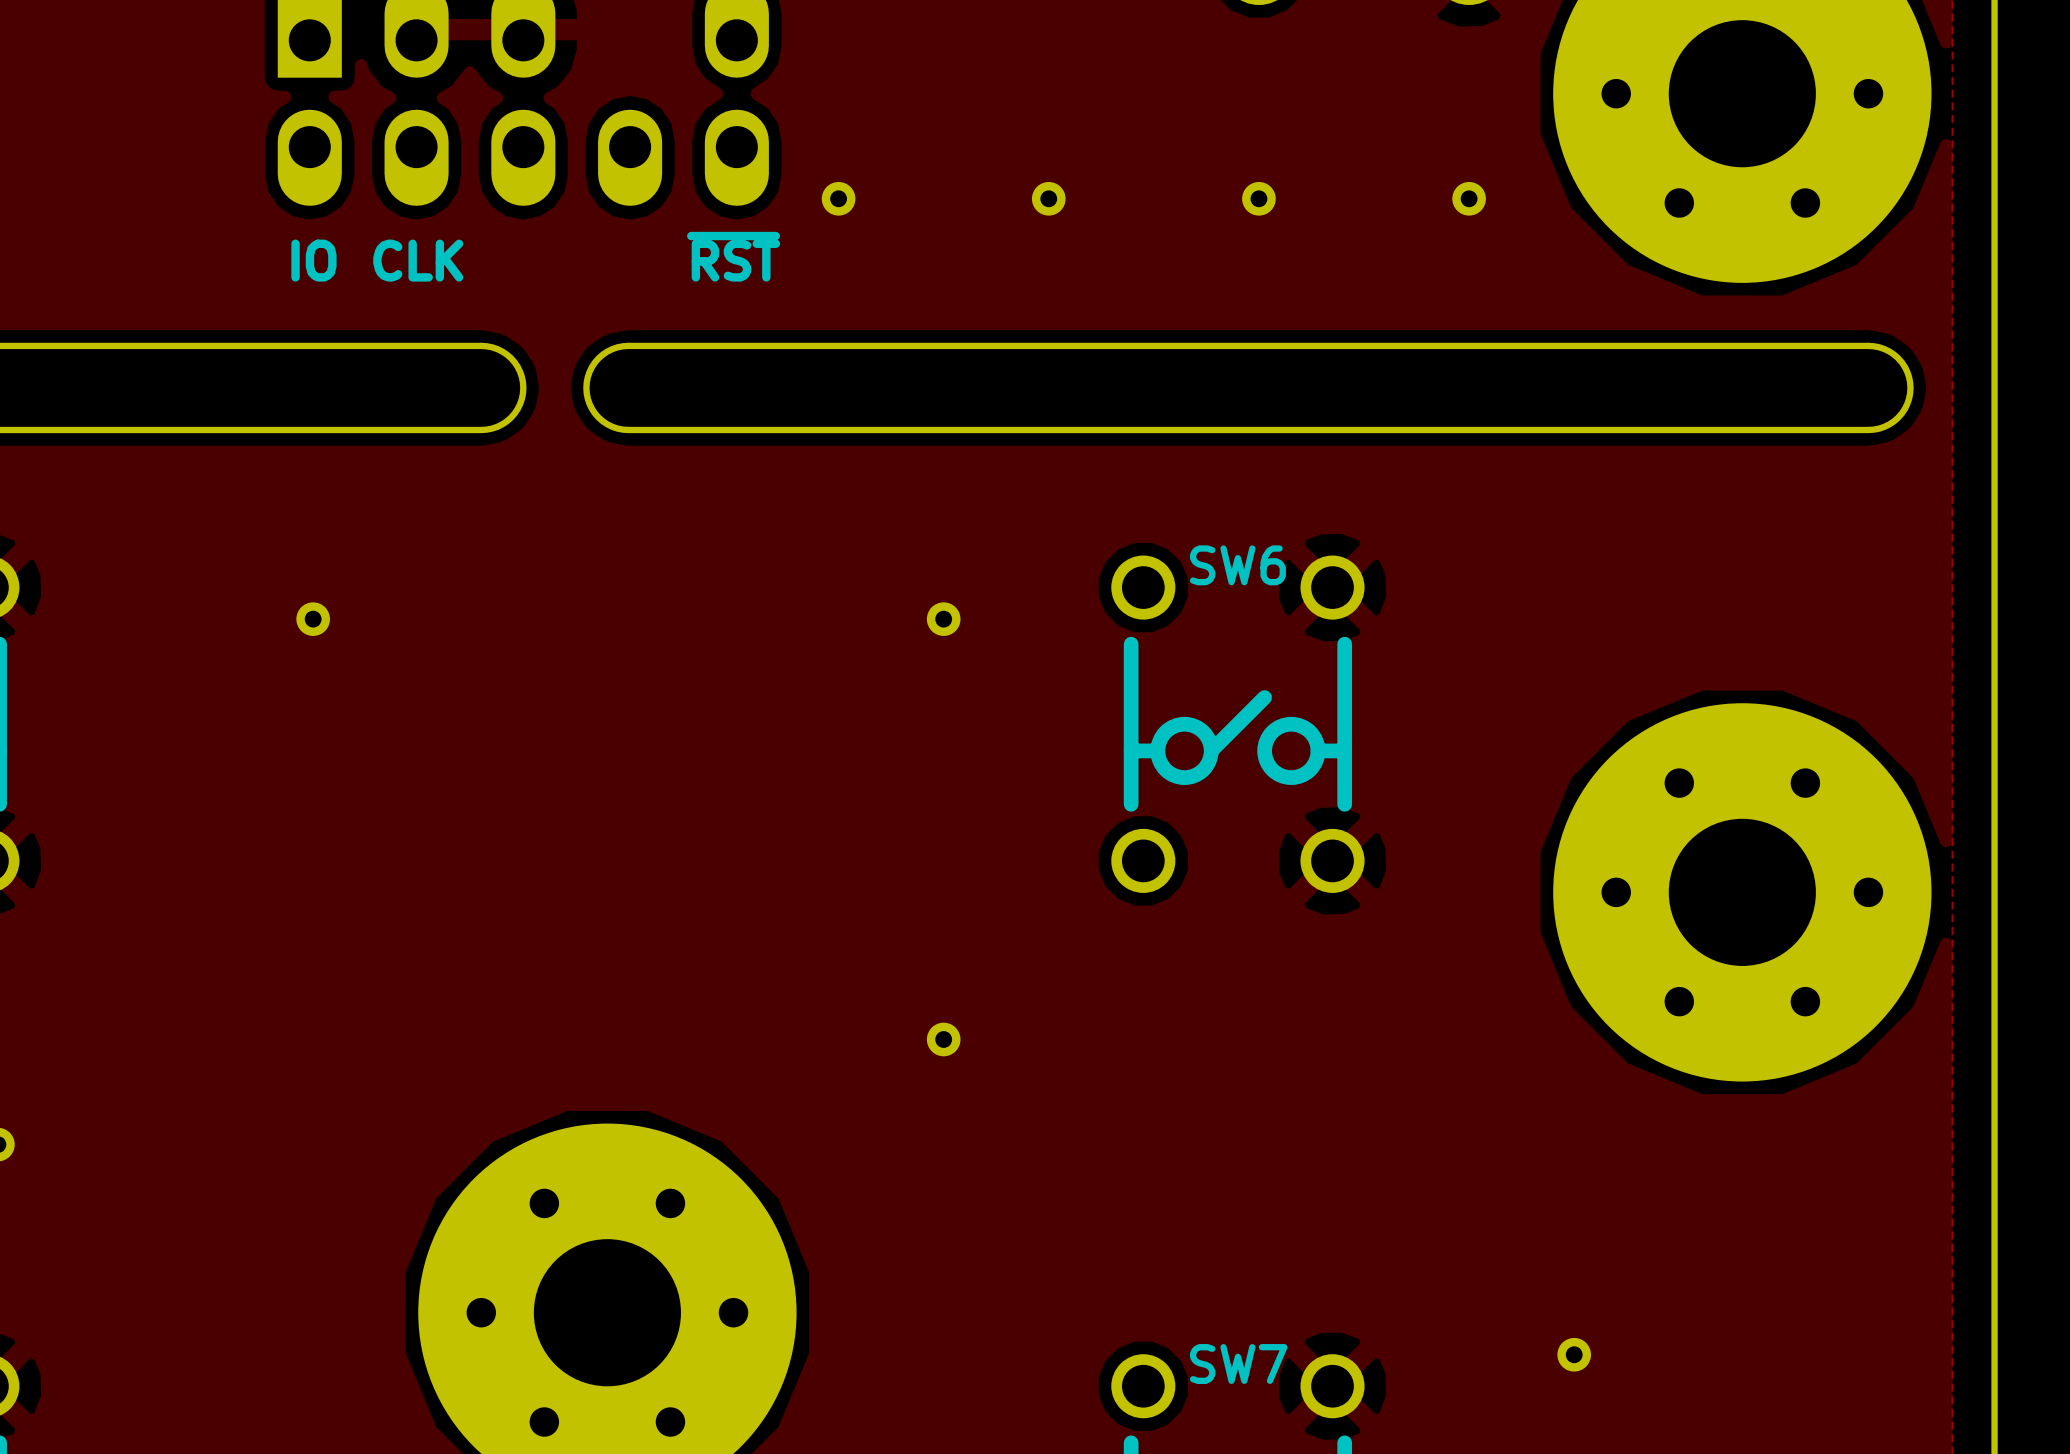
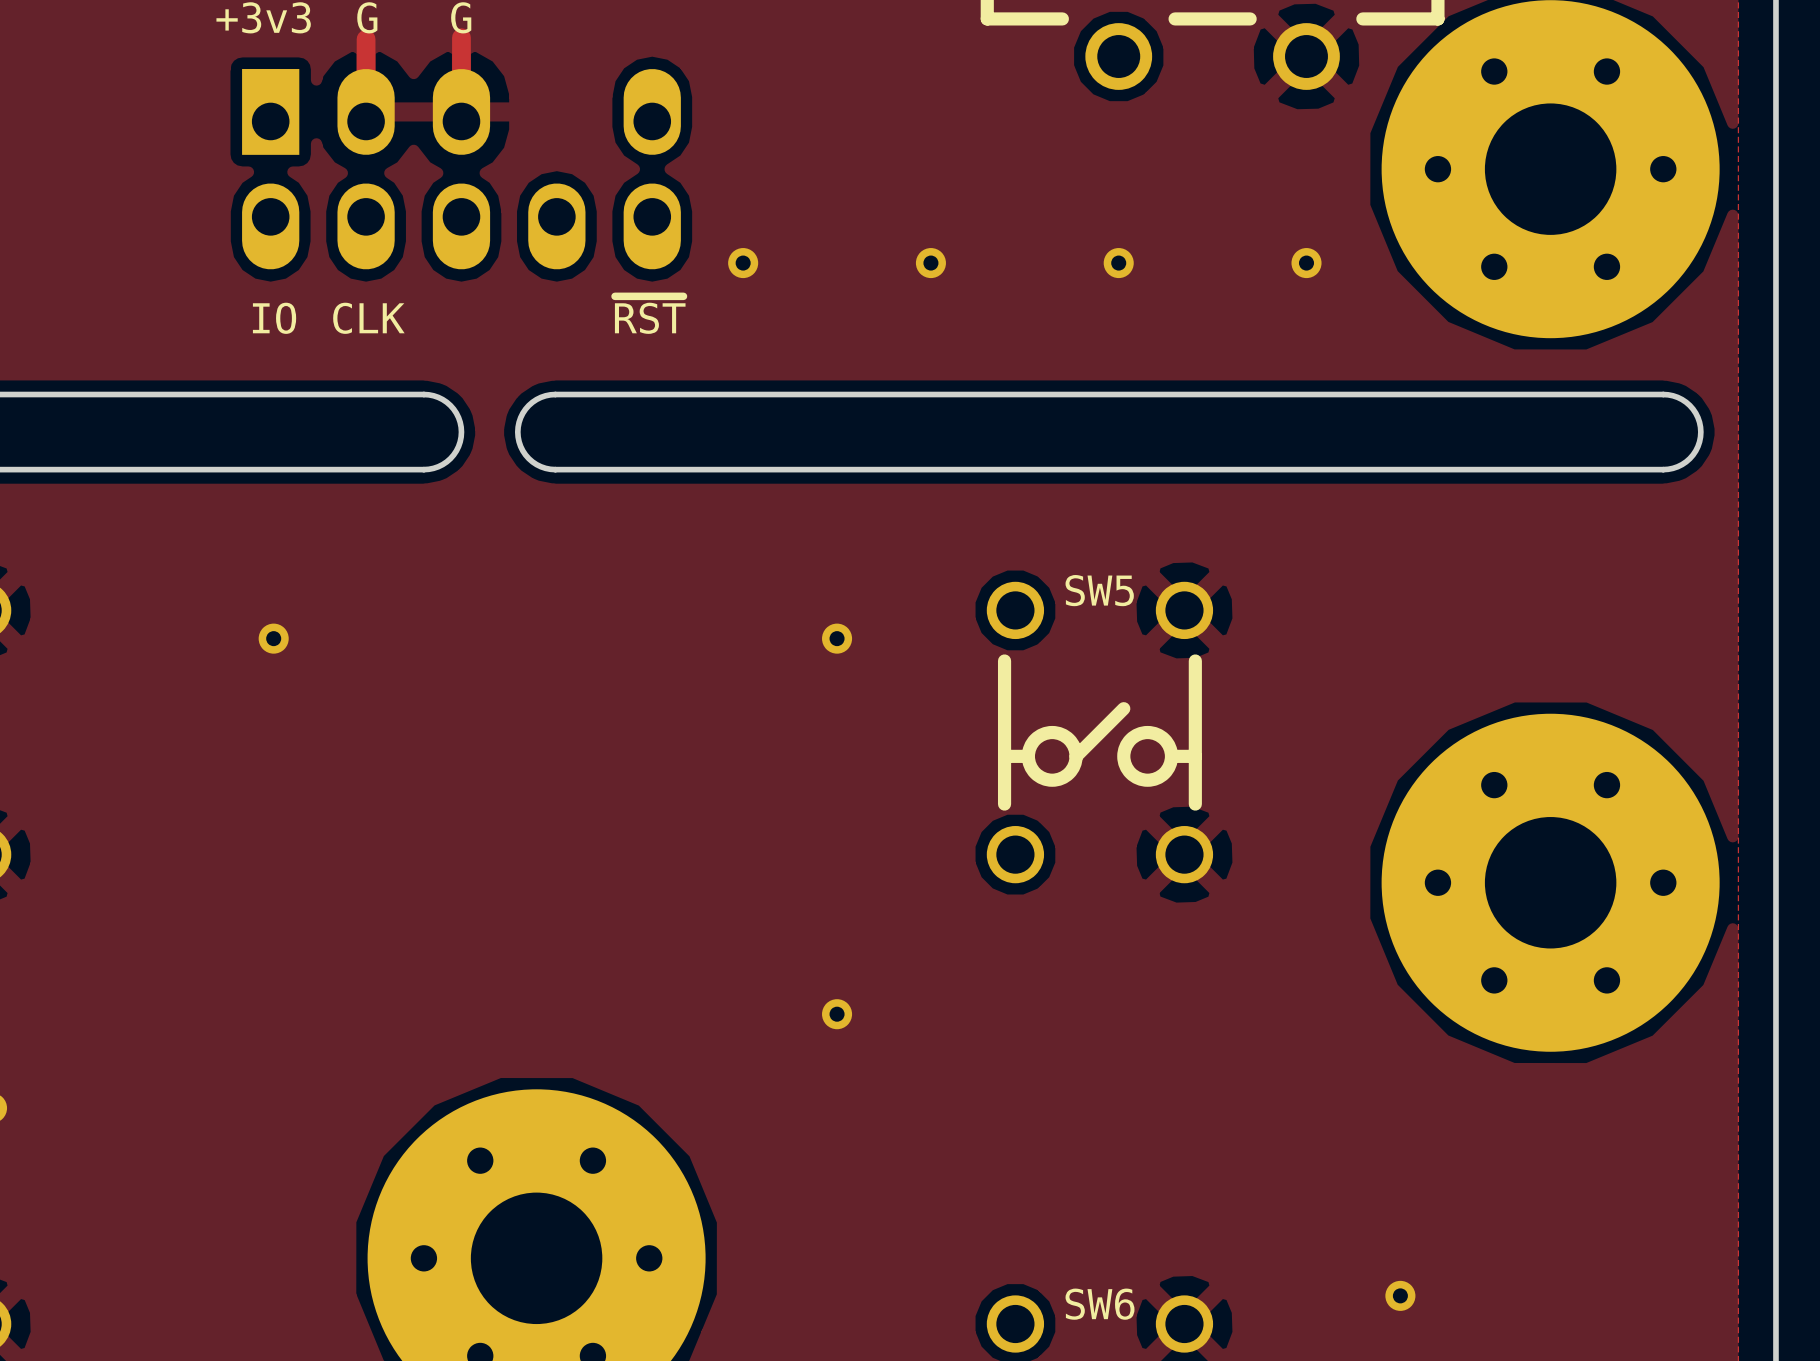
SW6 name: SW6 (1237, 565) -> SW5 (1099, 590)
SW7 name: SW7 (1238, 1364) -> SW6 (1100, 1304)

